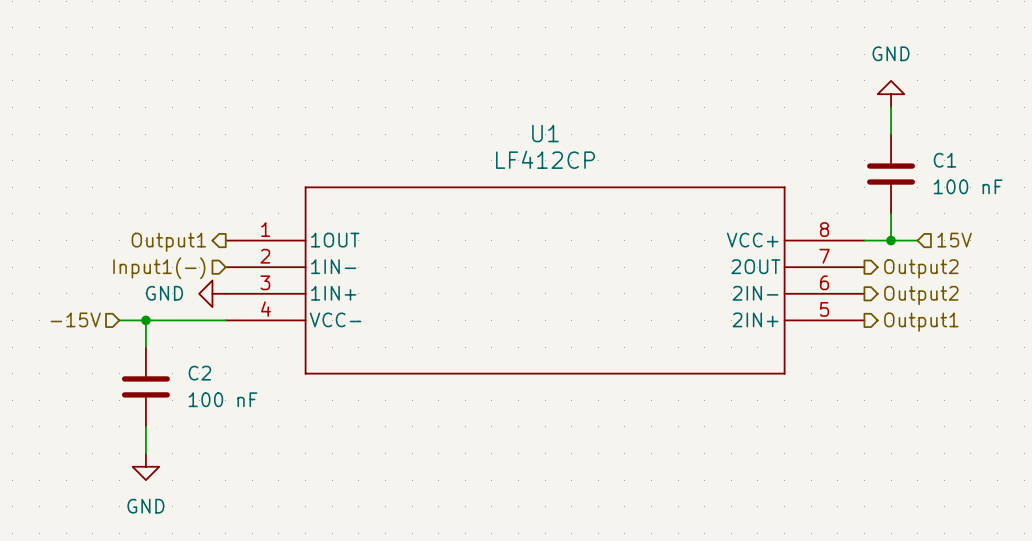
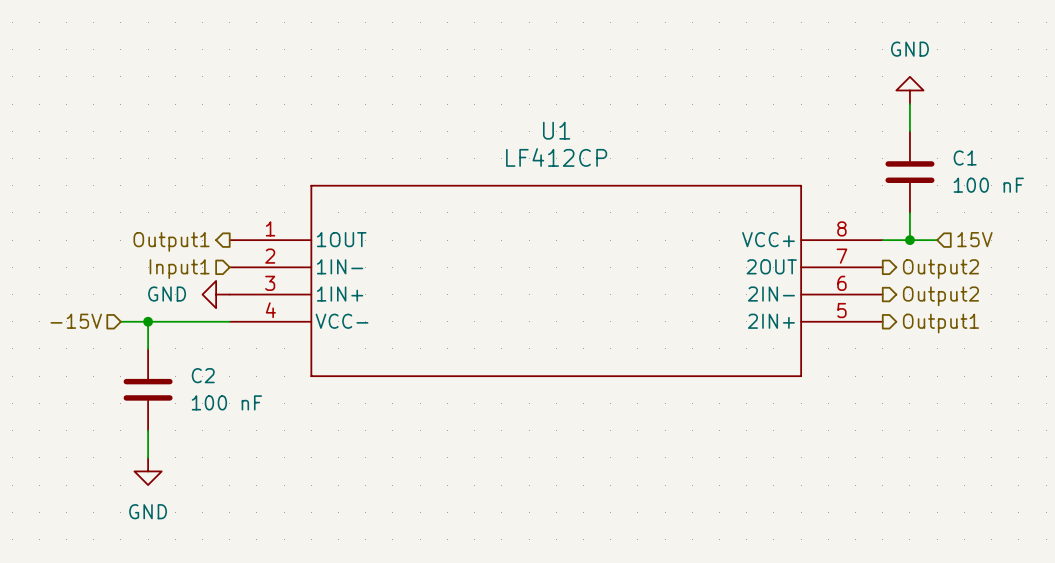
hierarchical label: Input1(-) (159, 268) -> Input1 (179, 269)

